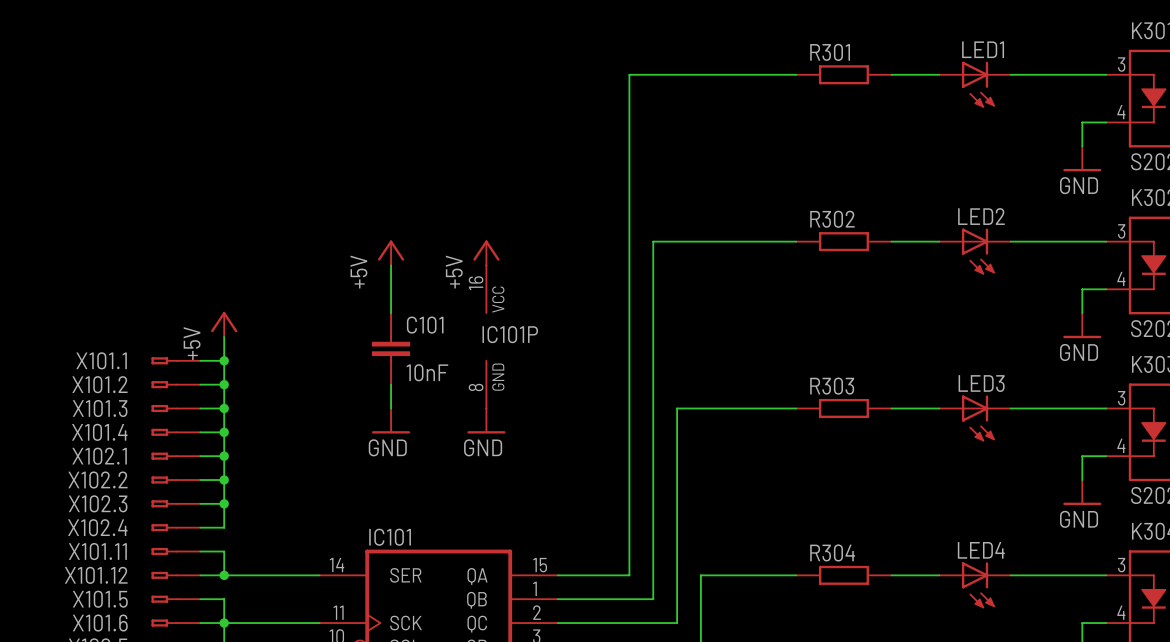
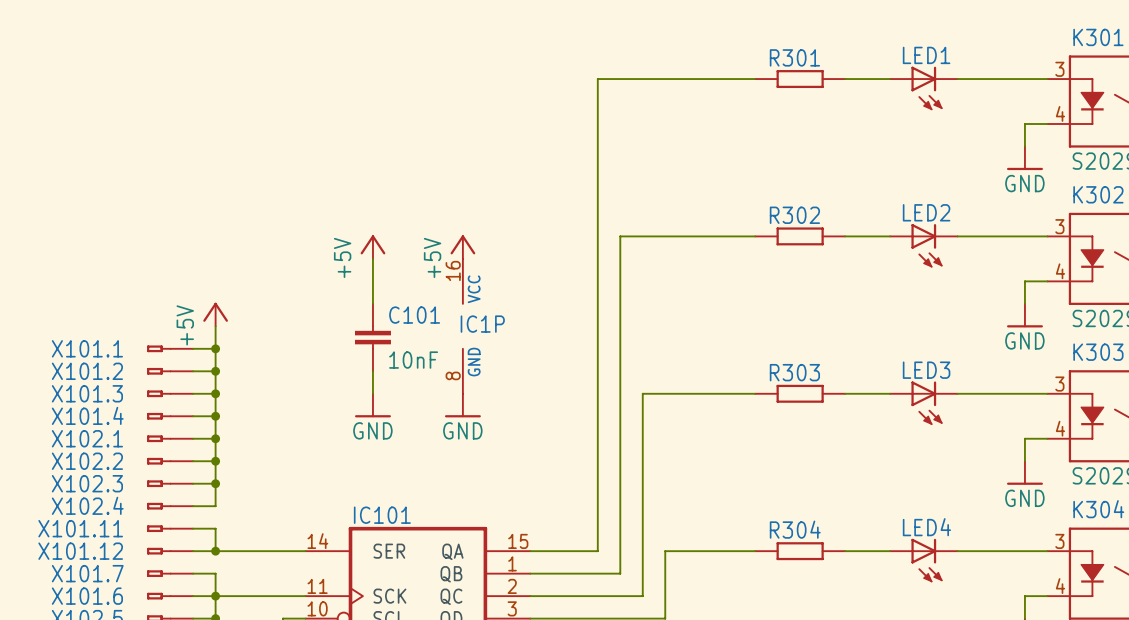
IC101P name: IC101P (510, 334) -> IC1P (482, 324)
X101.5 name: X101.5 (100, 599) -> X101.7 (87, 573)

